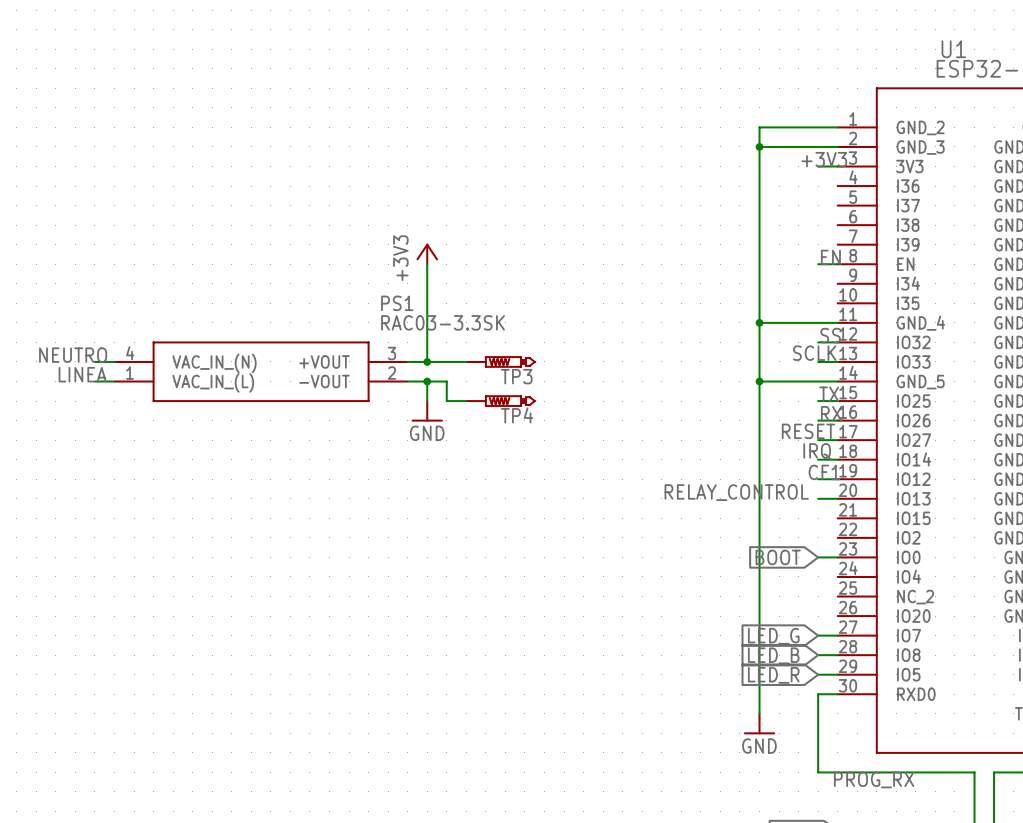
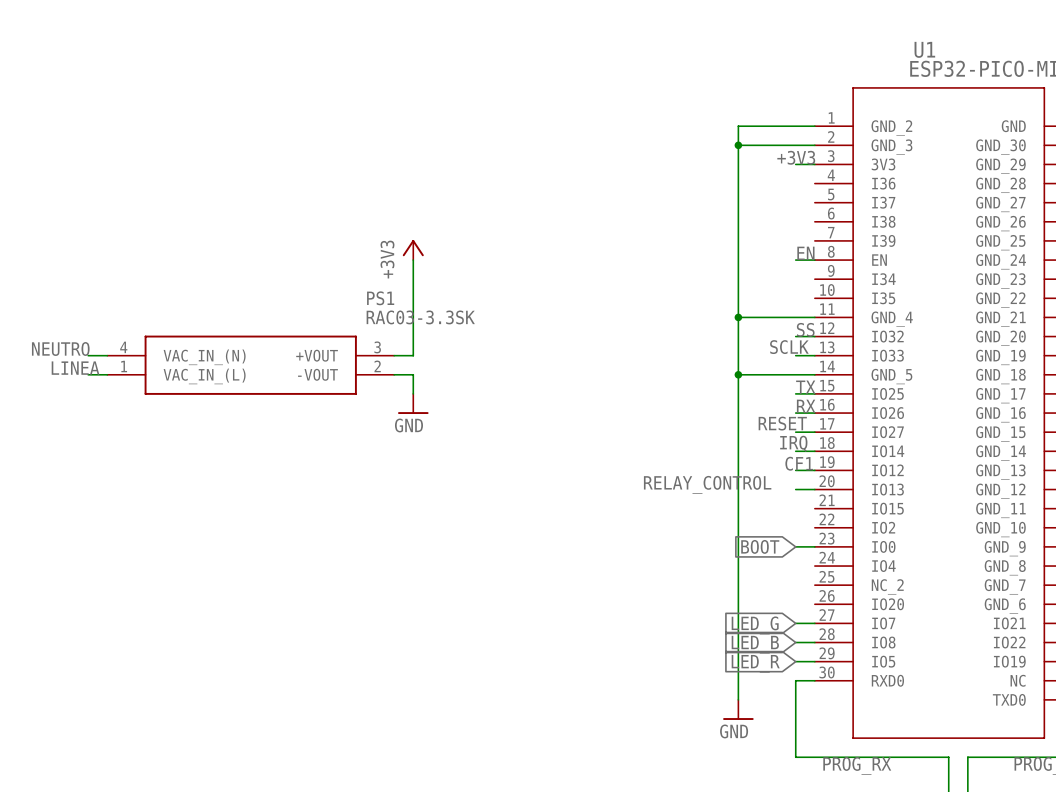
wire: (427, 361) (466, 361) -> none
junction: (427, 361) -> none
TP3: (500, 361) -> none
wire: (427, 381) (446, 381) (446, 401) (466, 401) -> none
junction: (427, 381) -> none
TP4: (500, 401) -> none

